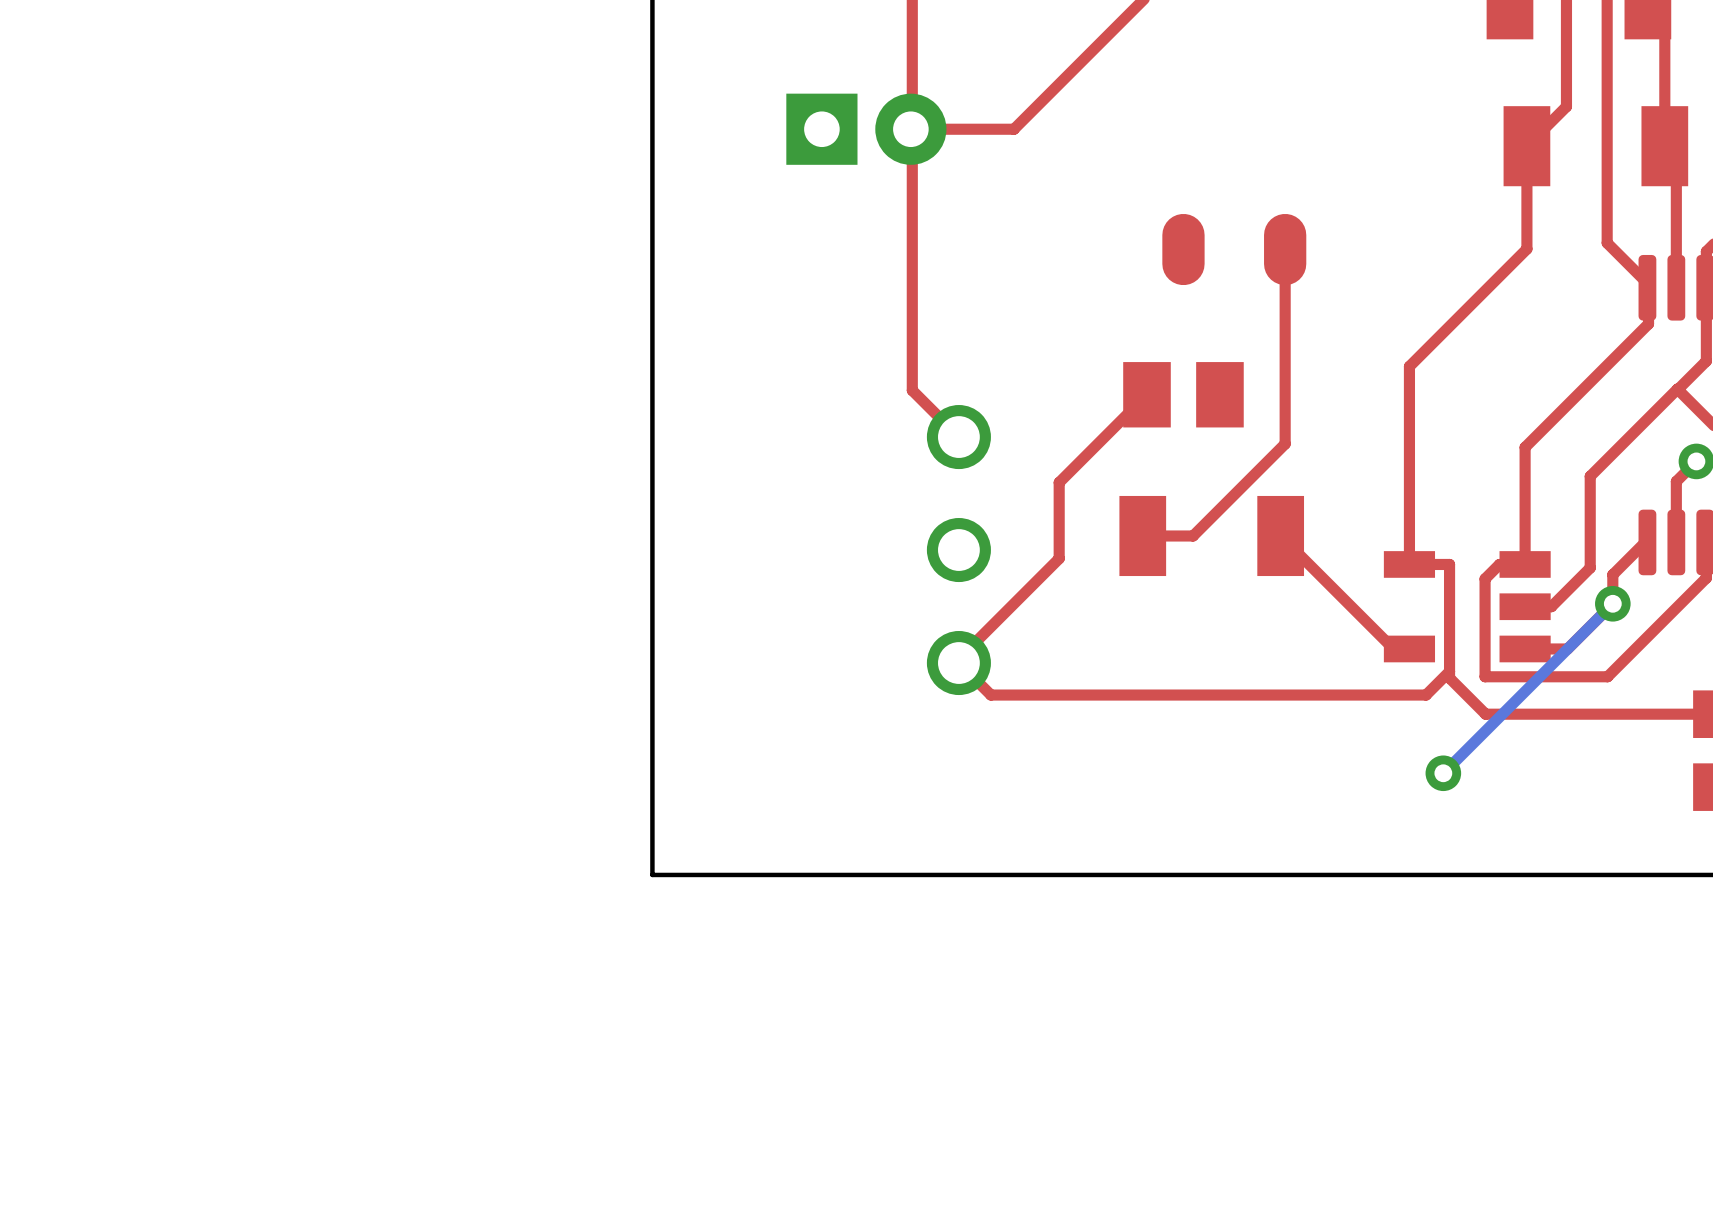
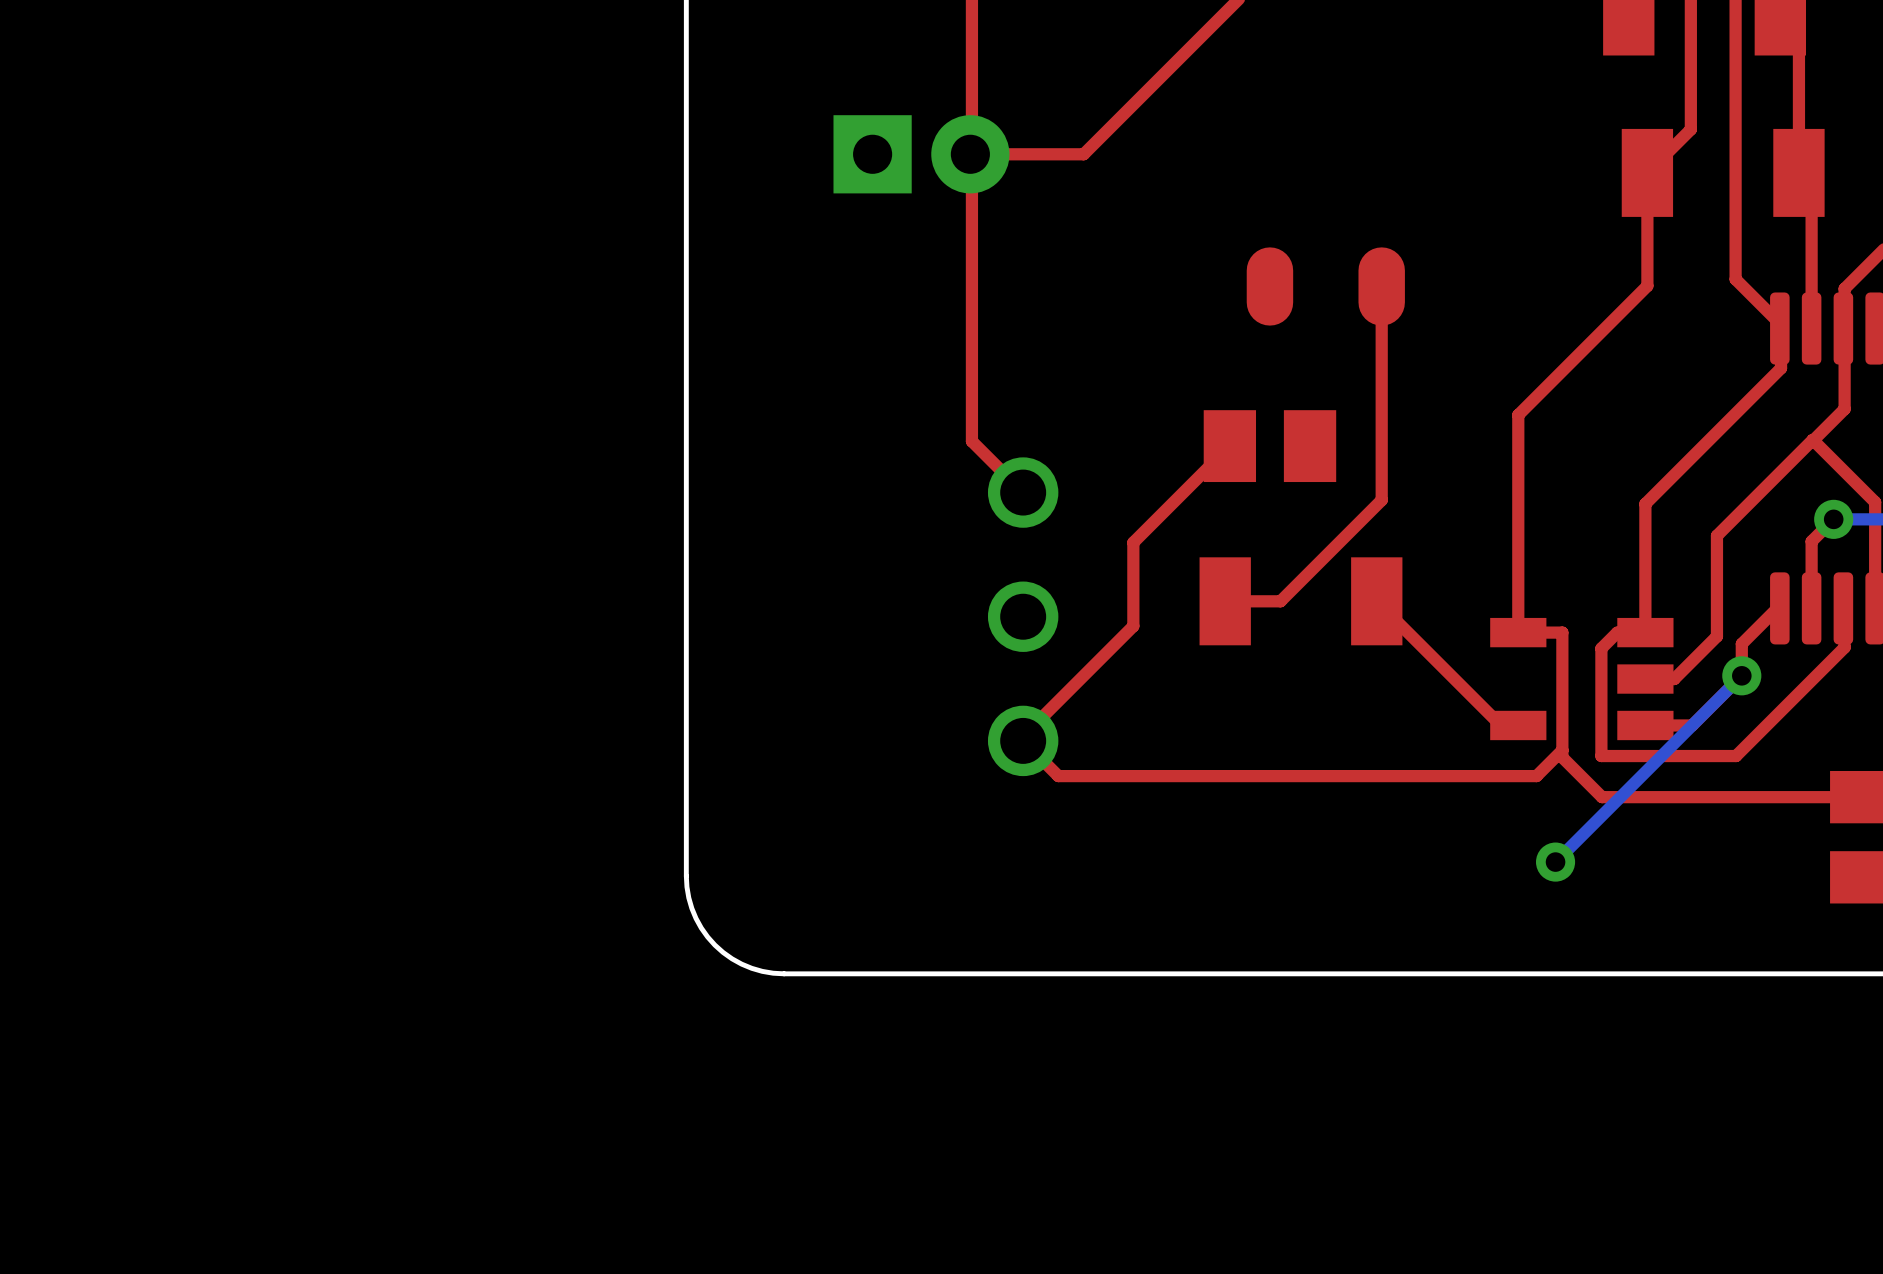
board edge: (652, 785) (652, 874) (741, 874) -> (686, 876) (691, 908) (701, 928) (714, 945) (741, 964) (762, 971) (784, 973)

